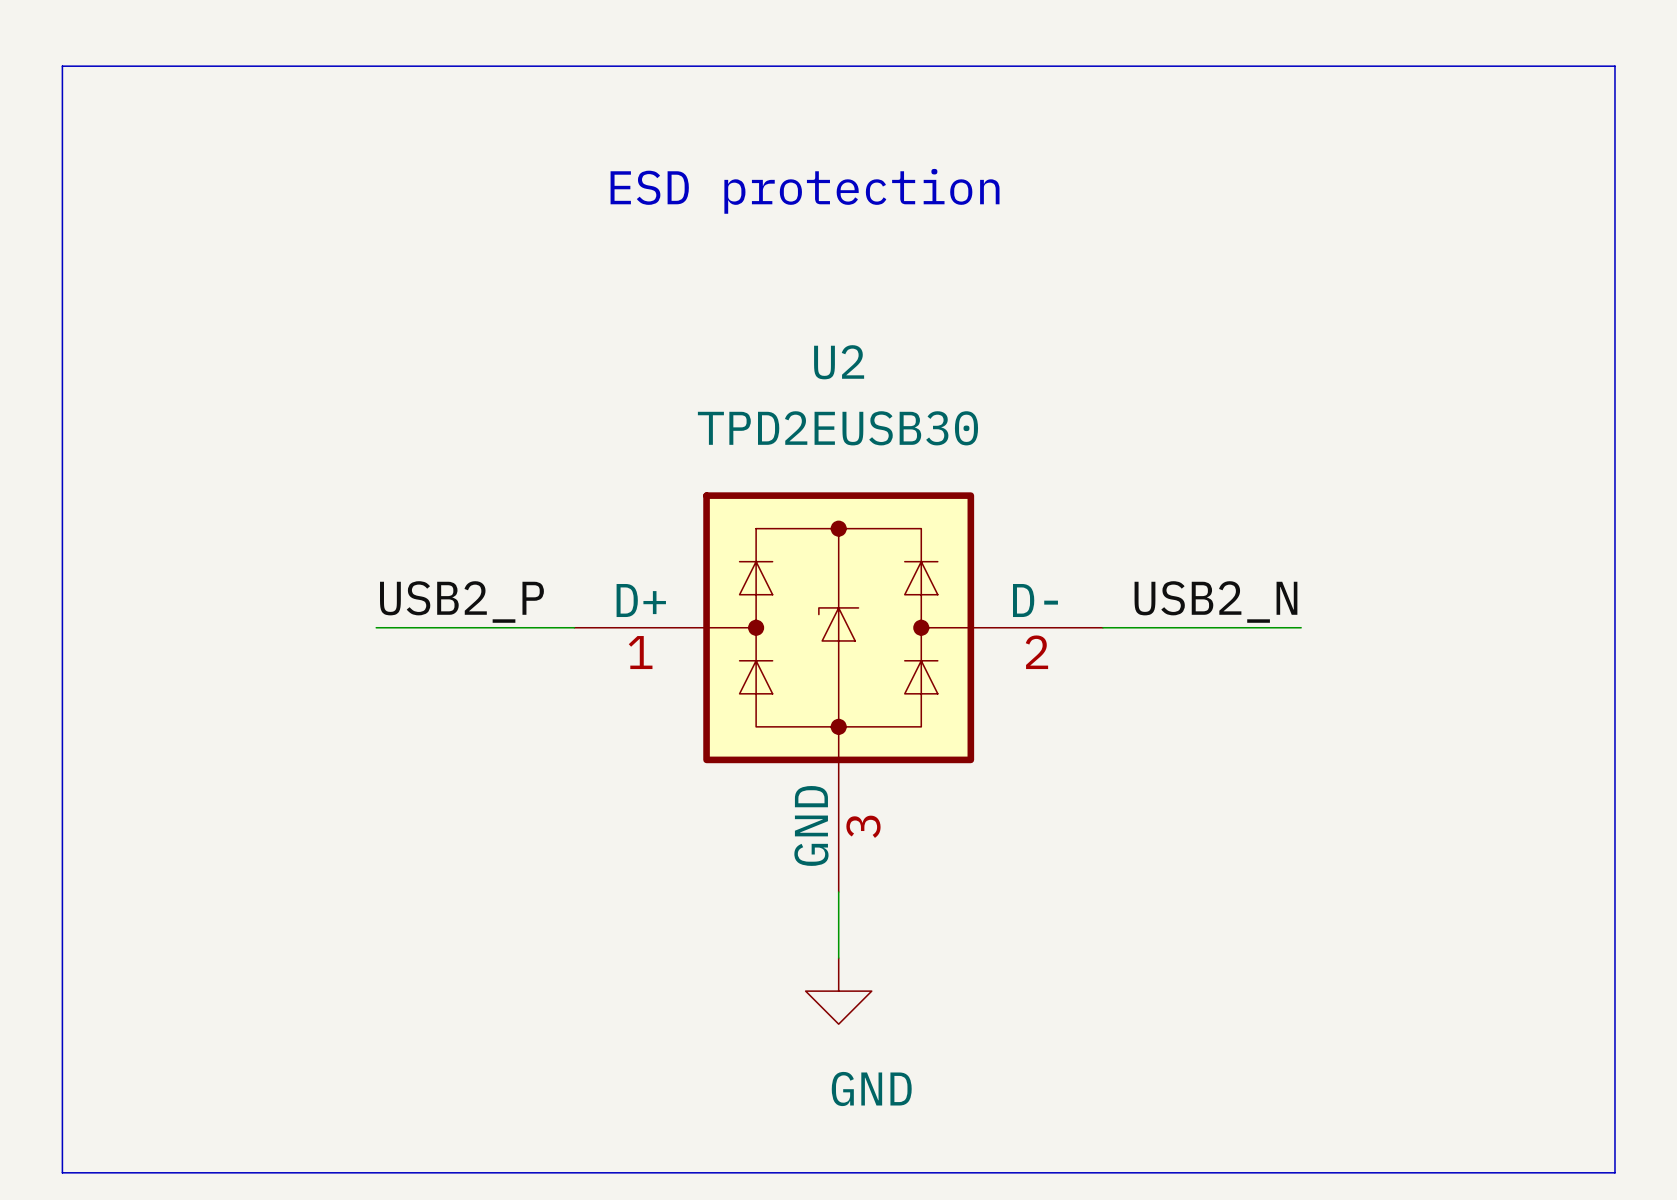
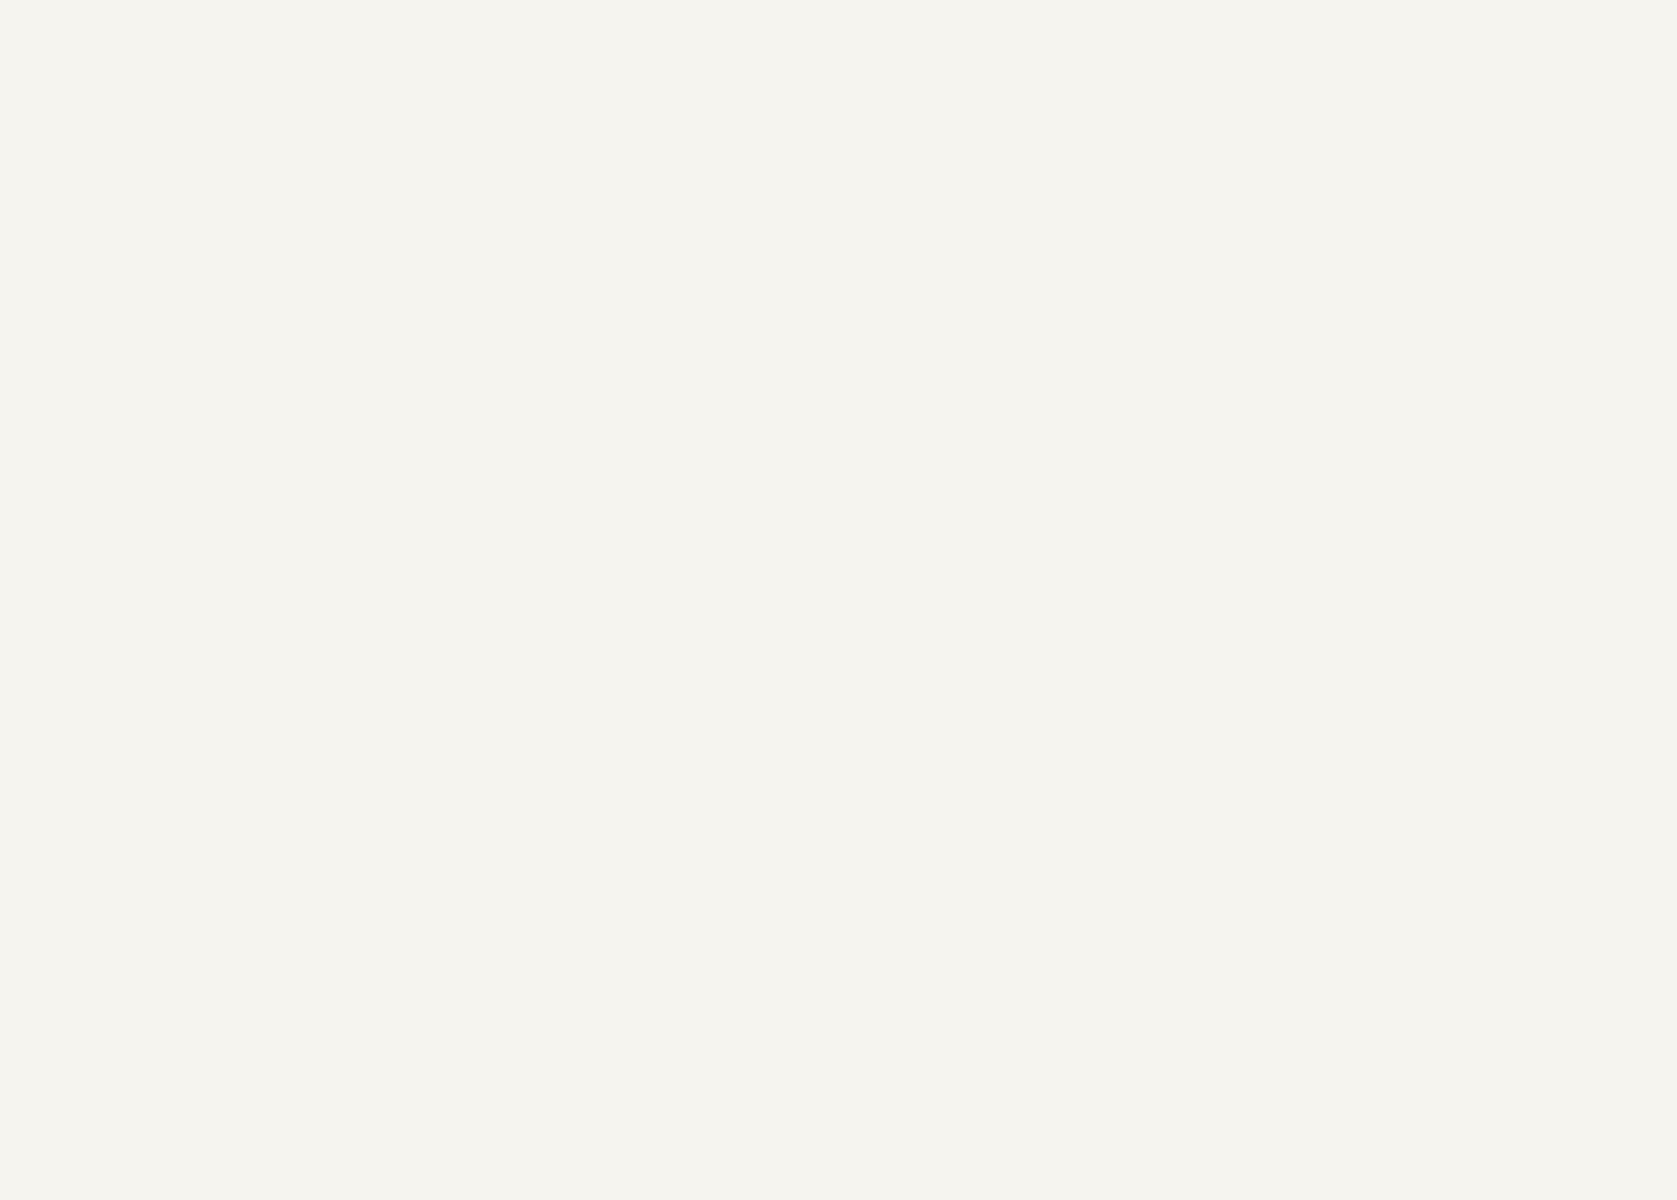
line: (62, 66) (1614, 66) (1614, 1172) (62, 1172) (62, 66) -> none
text: ESD protection (805, 191) -> none
label: USB2_P (461, 601) -> none
label: USB2_N (1215, 601) -> none
wire: (376, 627) (574, 627) -> none
wire: (1102, 627) (1301, 627) -> none
U2: TPD2EUSB30 (838, 692) -> none
wire: (838, 892) (838, 958) -> none
power symbol: GND (838, 991) -> none

